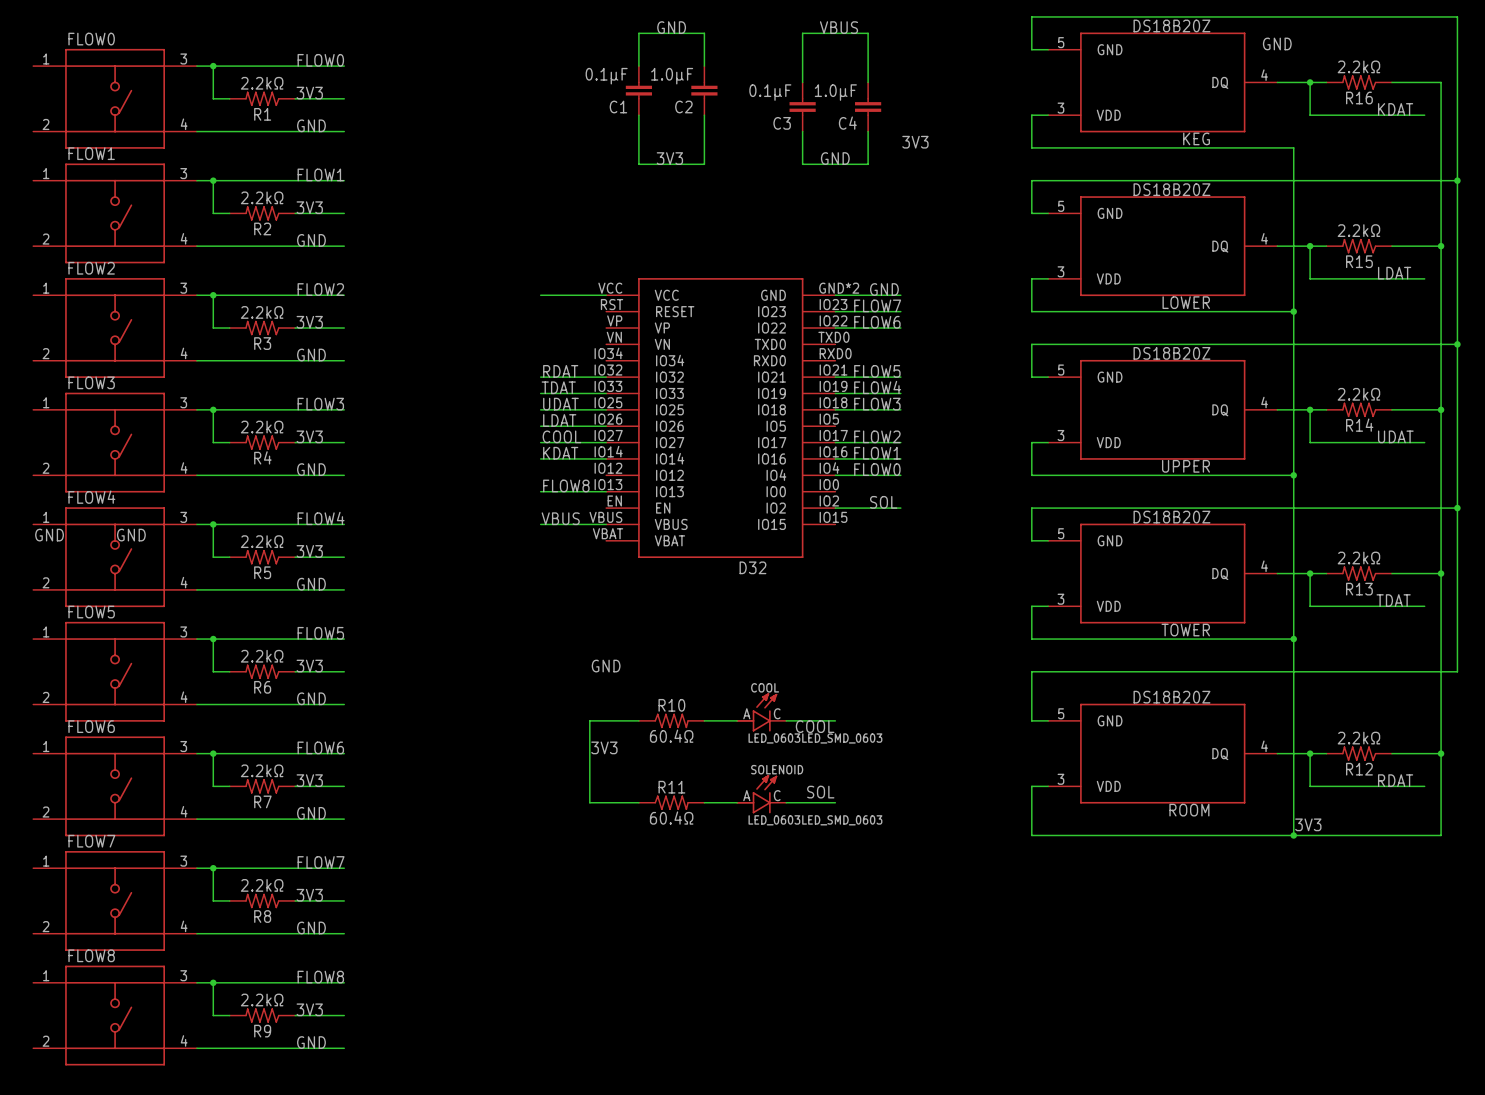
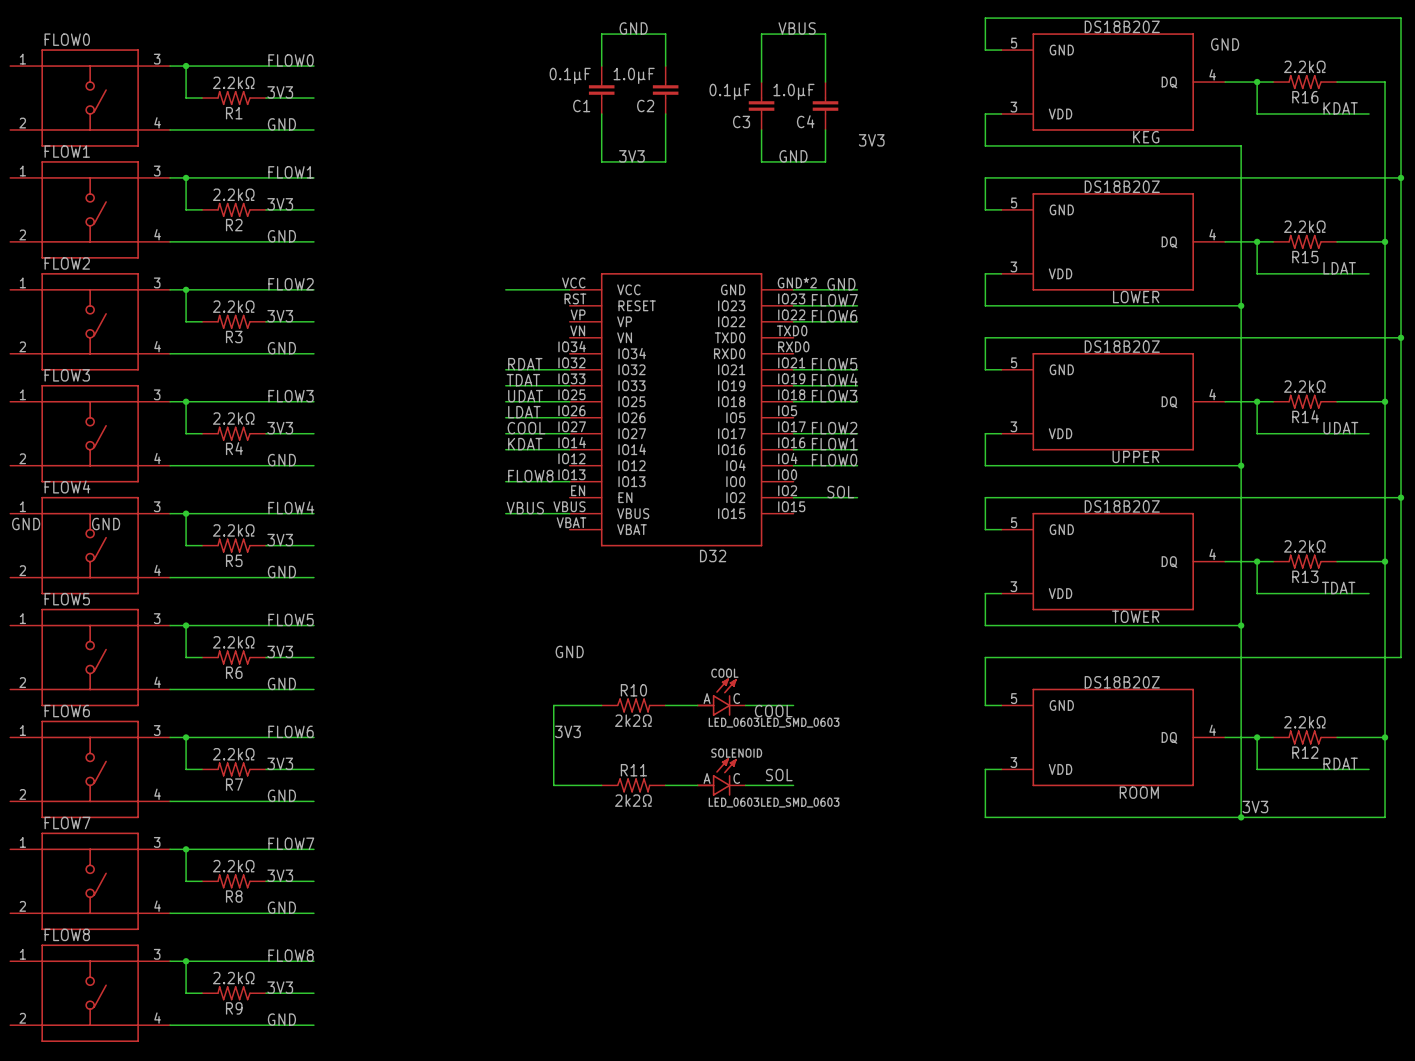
R10 value: 60.4Ω (671, 736) -> 2k2Ω (633, 720)
R11 value: 60.4Ω (671, 818) -> 2k2Ω (633, 800)

